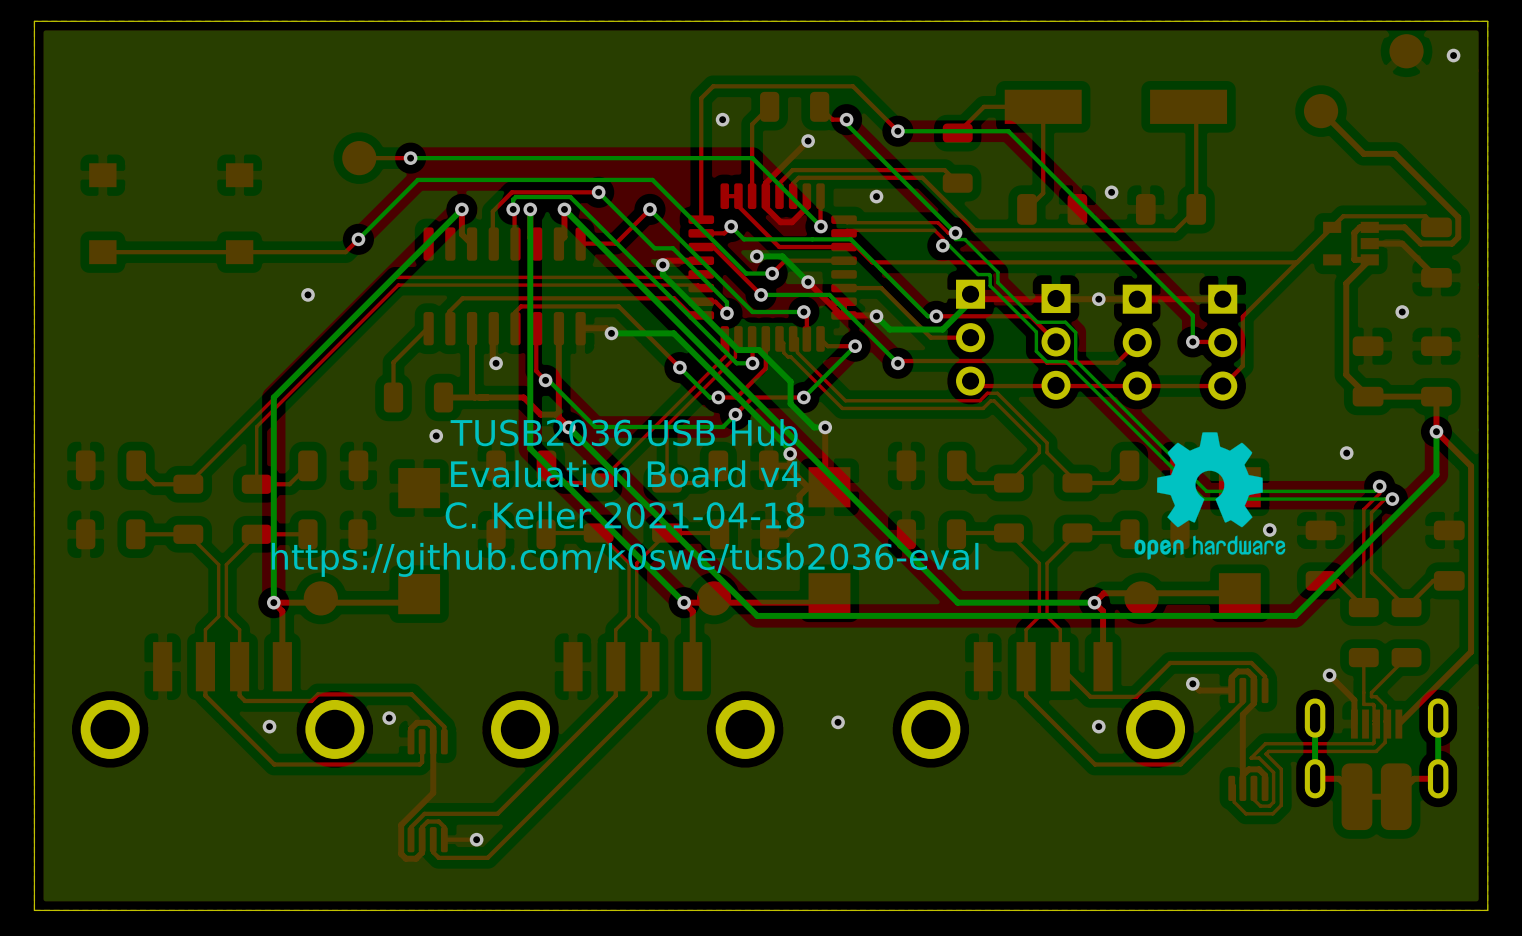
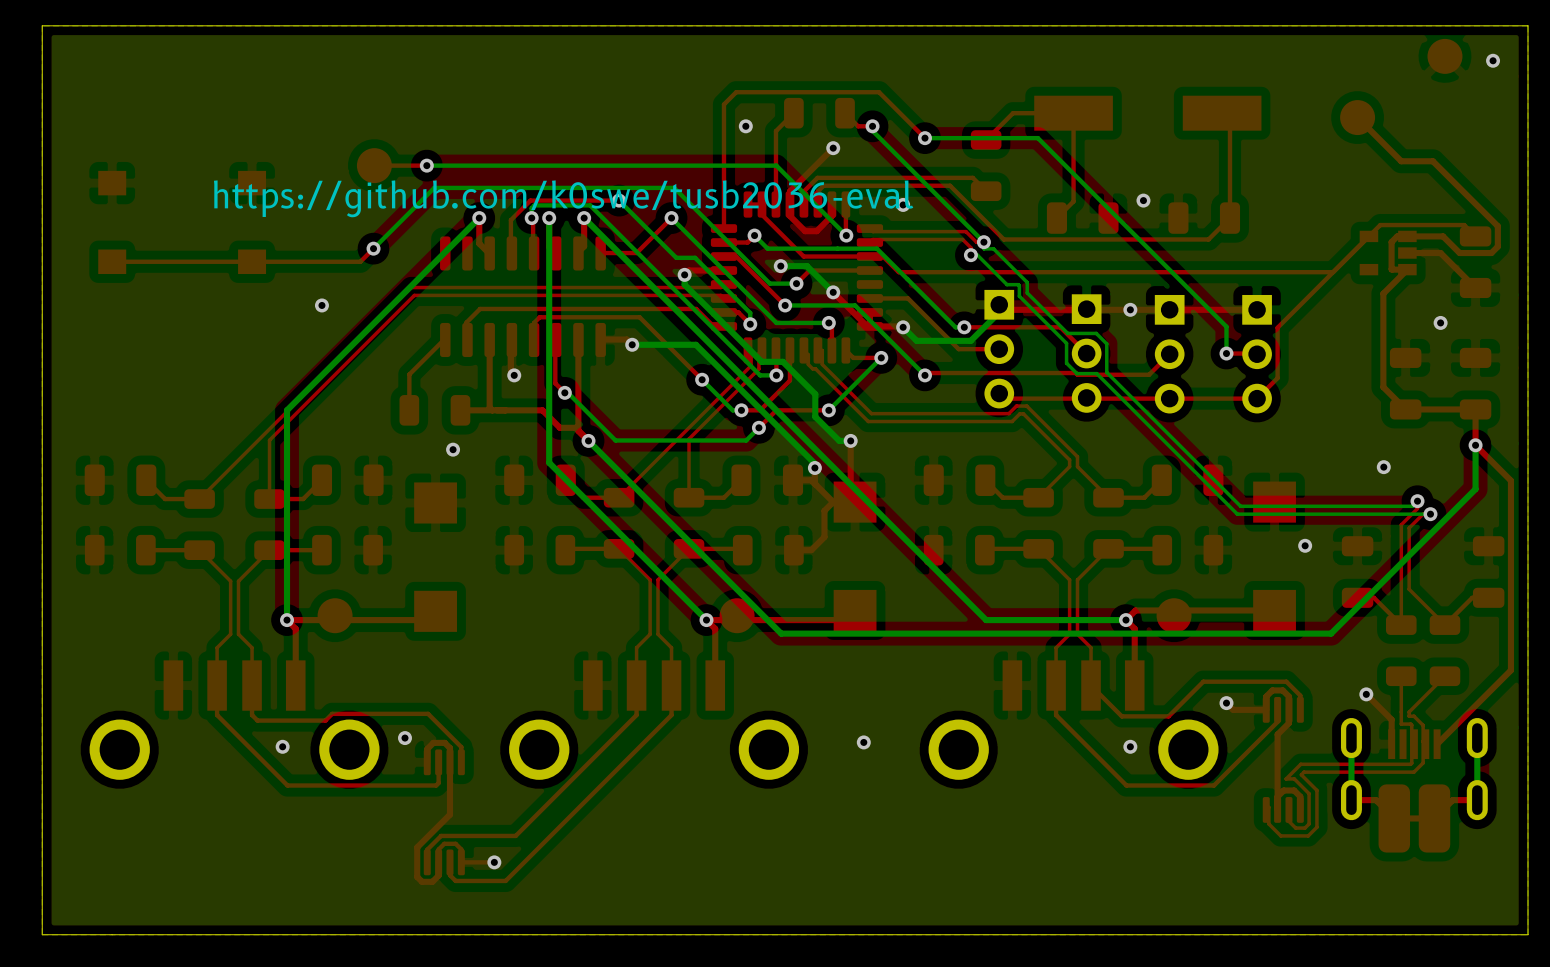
text: TUSB2036 USB Hub (624, 432) -> none
drawing: [1134, 432, 1286, 560] -> none
text: Evaluation Board v4 (625, 473) -> none
text: C. Keller 2021-04-18 (624, 515) -> none
text position: https://github.com/k0swe/tusb2036-eval (625, 559) -> https://github.com/k0swe/tusb2036-eval (563, 198)

